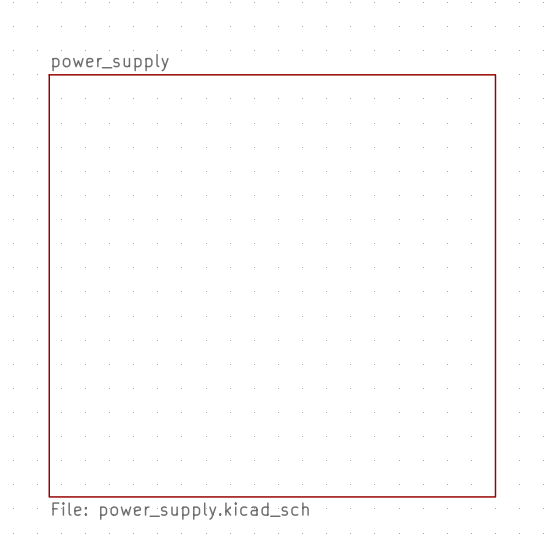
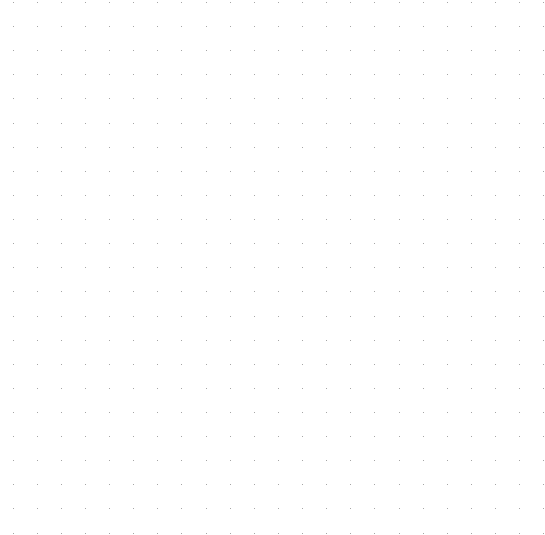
sheet power_supply: File: power_supply.kicad_sch (272, 285) -> none

